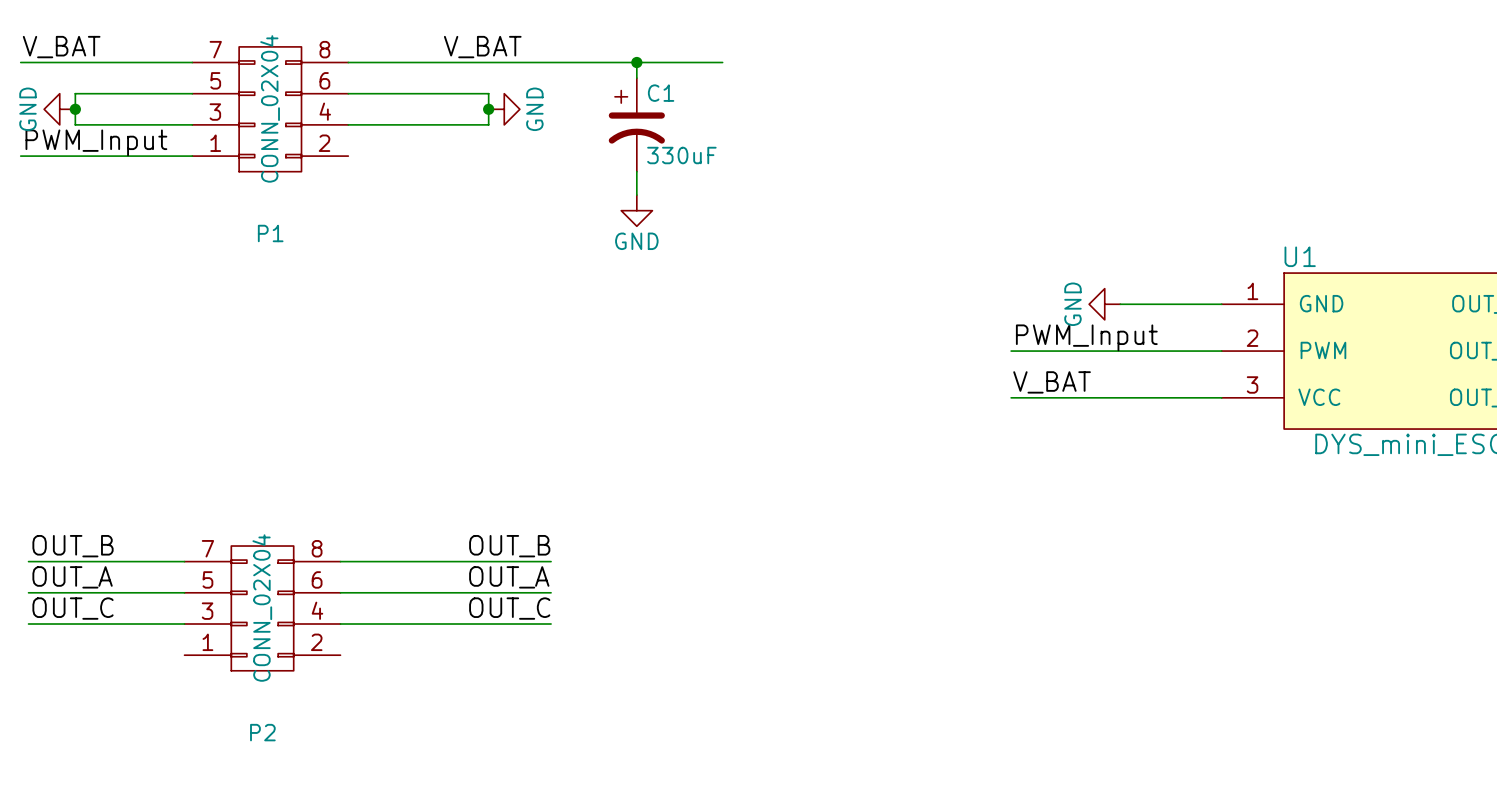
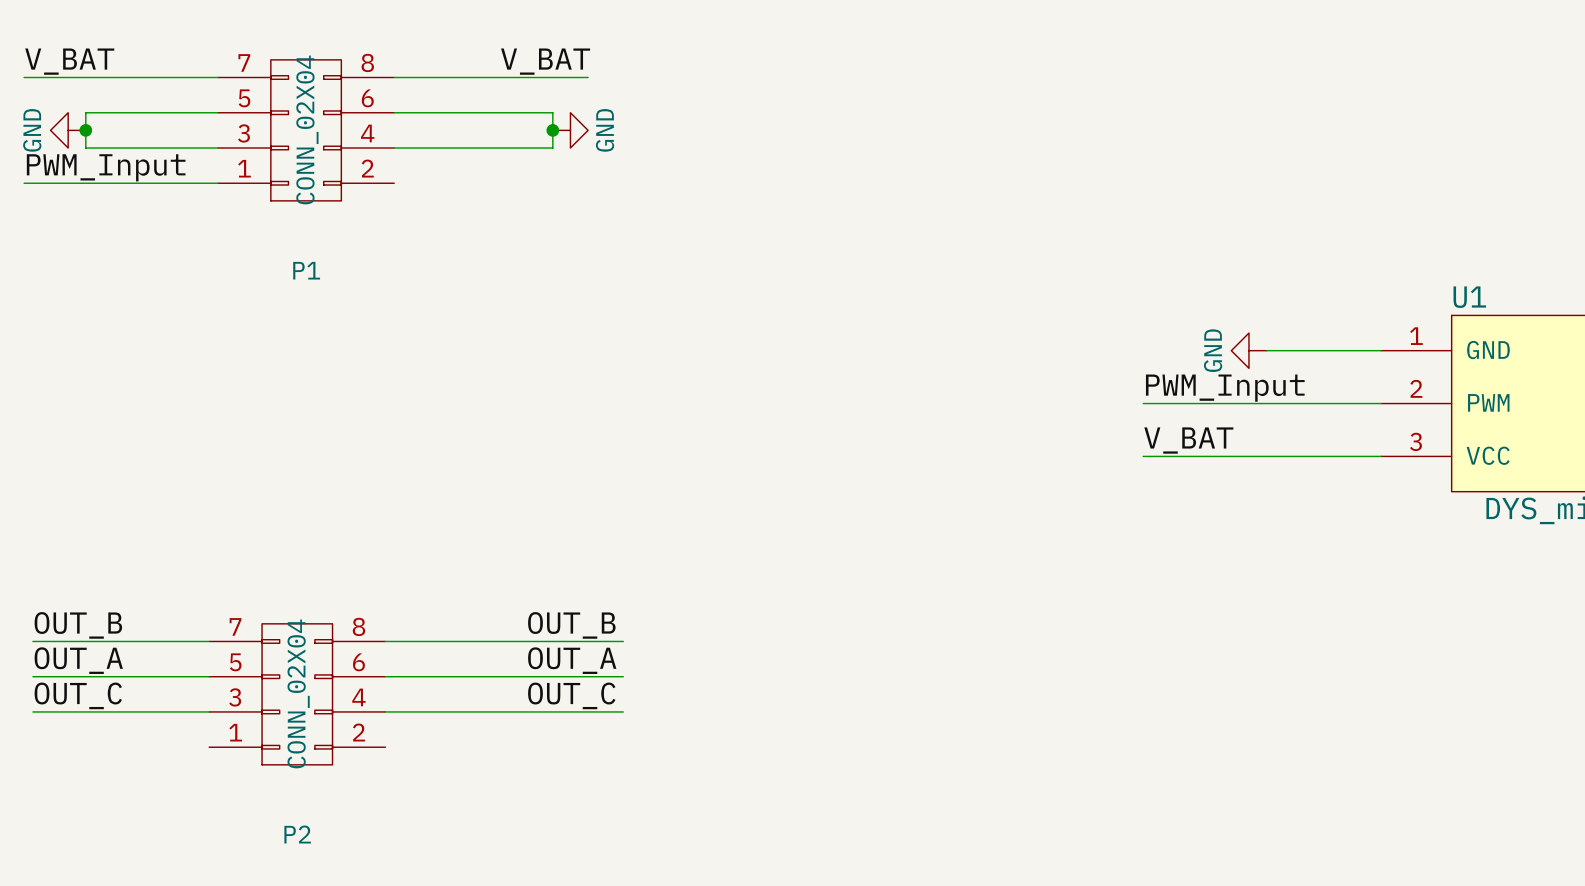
wire: (519, 62) (722, 62) -> none
wire: (636, 62) (636, 78) -> none
junction: (636, 62) -> none
C1: 330uF (636, 124) -> none
wire: (636, 171) (636, 195) -> none
power symbol: GND (636, 210) -> none

